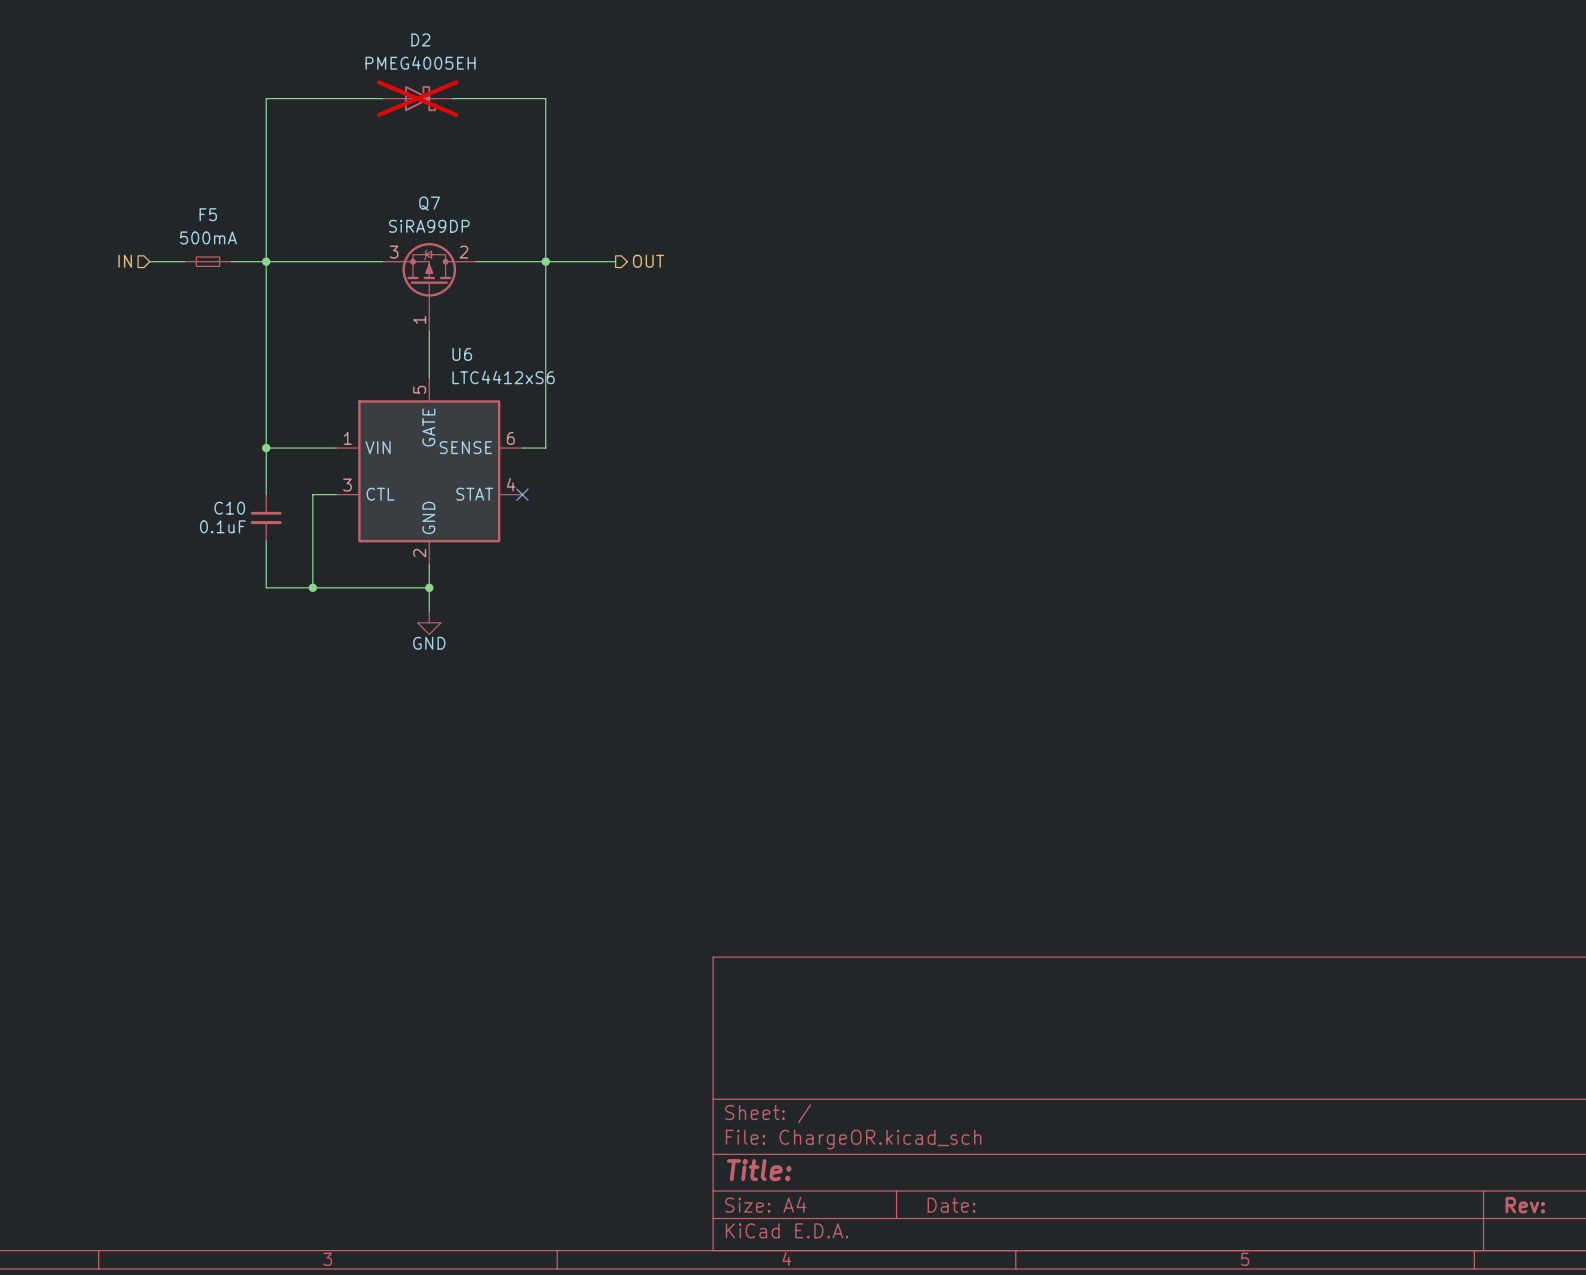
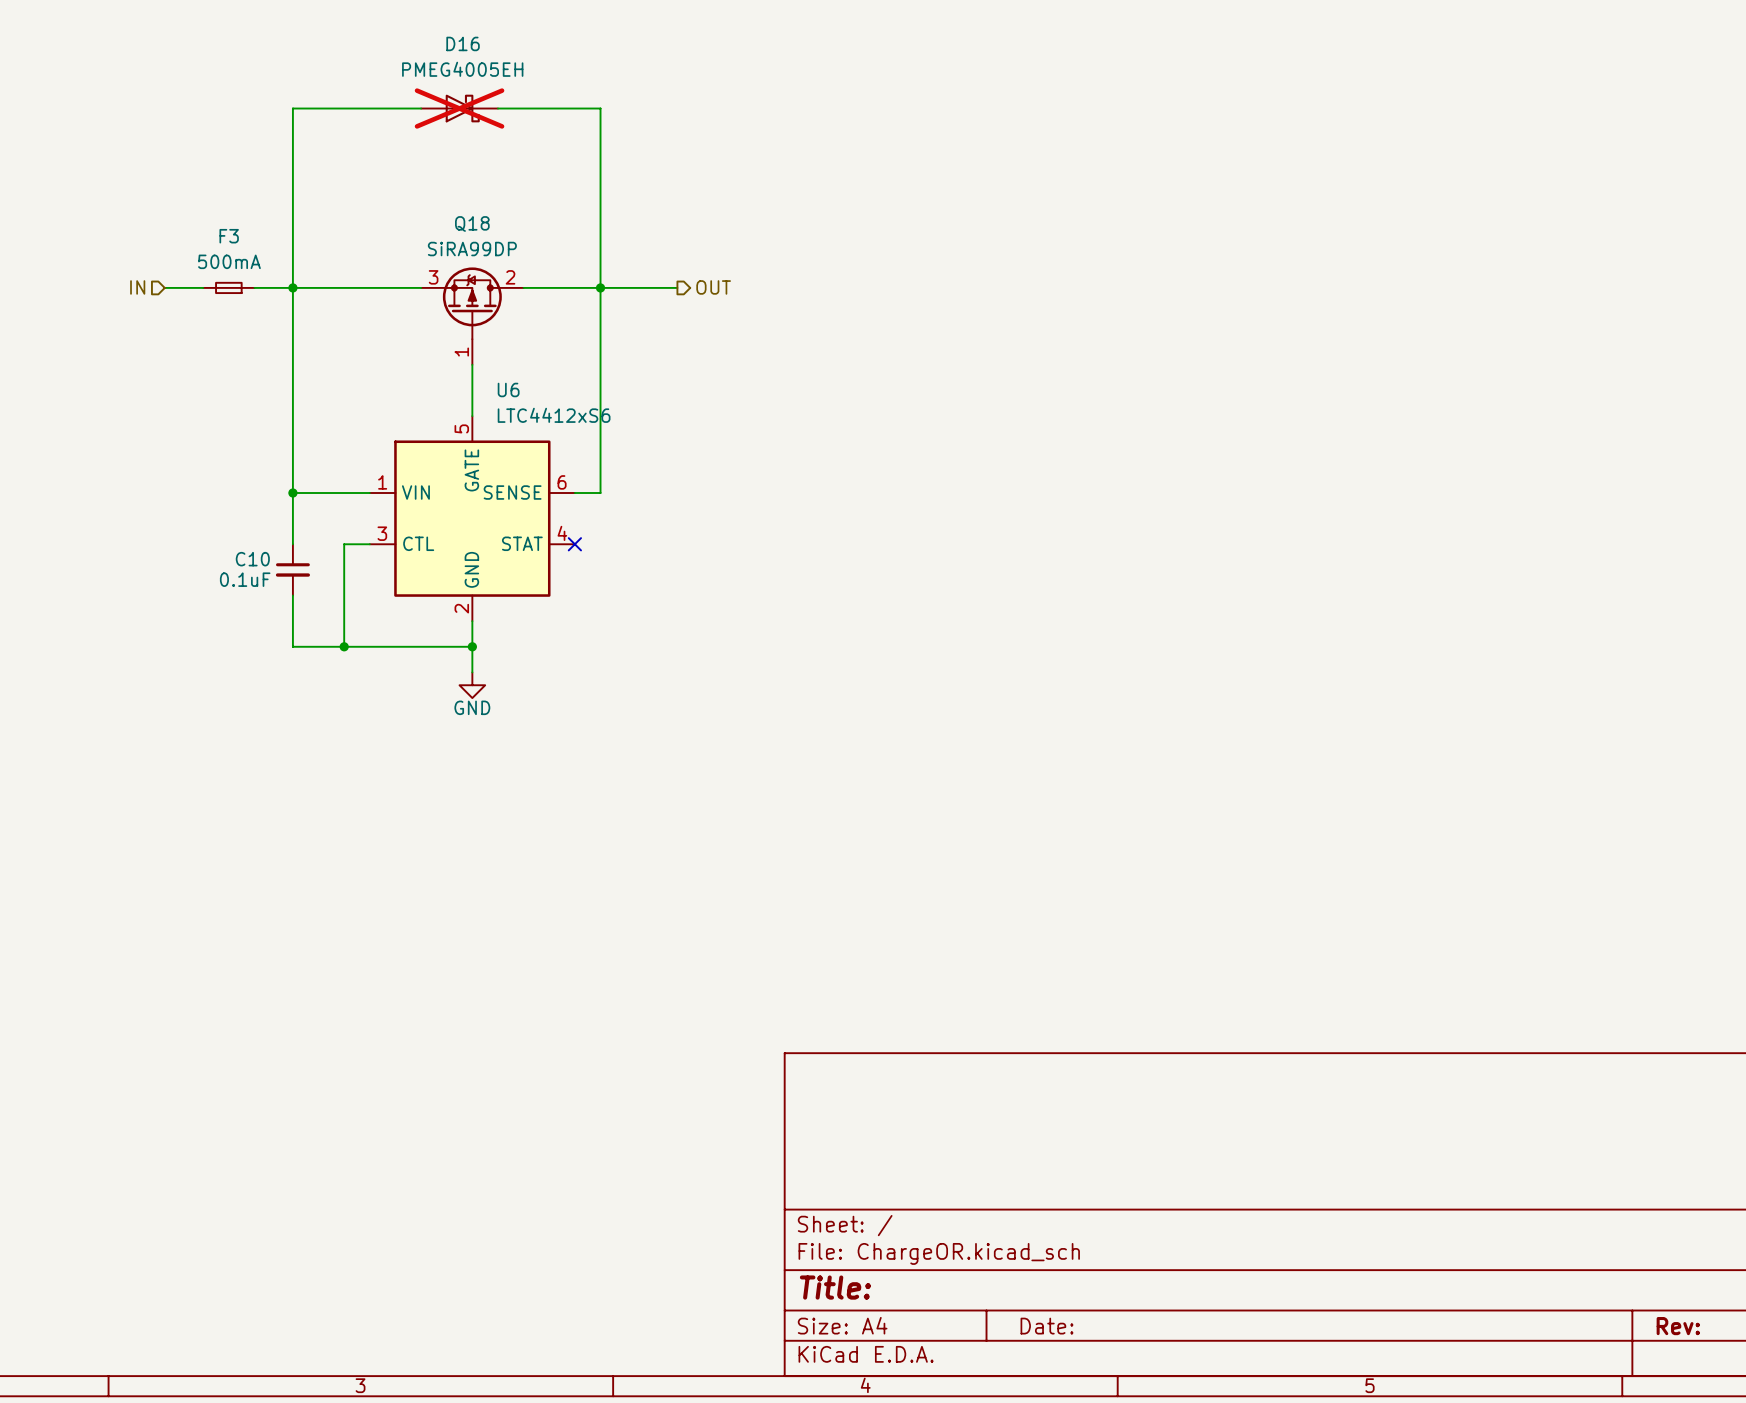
D2 name: D2 (420, 39) -> D16 (463, 43)
Q7 name: Q7 (429, 203) -> Q18 (472, 223)
F5 name: F5 (208, 214) -> F3 (229, 236)

